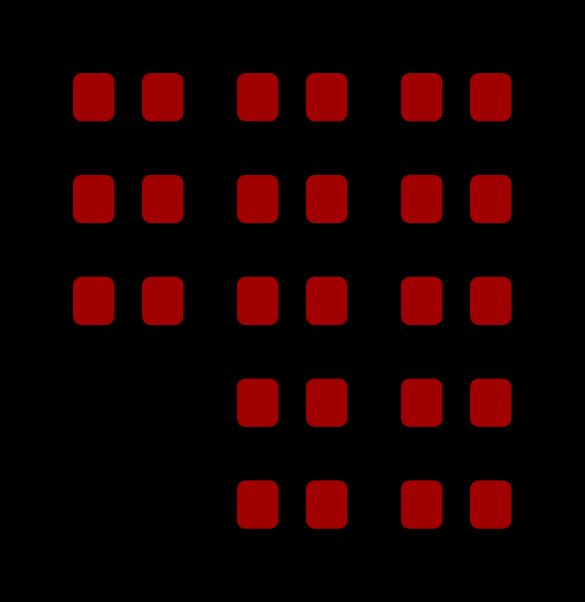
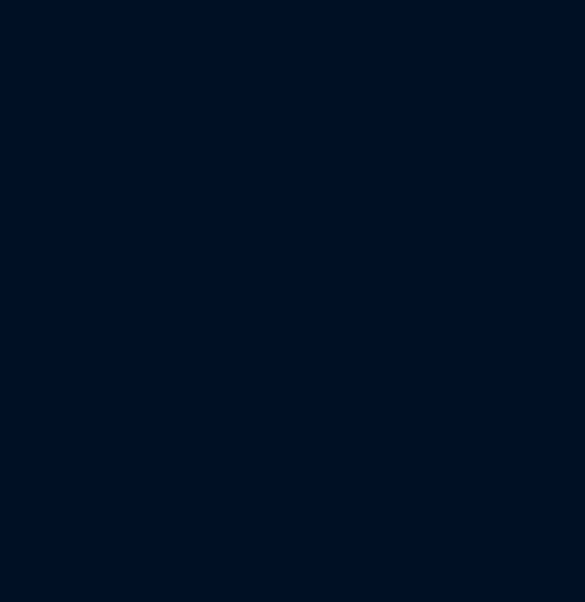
part: (128, 97) -> none
part: (292, 97) -> none
part: (456, 97) -> none
part: (128, 199) -> none
part: (292, 199) -> none
part: (456, 199) -> none
part: (128, 300) -> none
part: (292, 300) -> none
part: (456, 300) -> none
part: (292, 402) -> none
part: (456, 402) -> none
part: (292, 504) -> none
part: (456, 504) -> none

